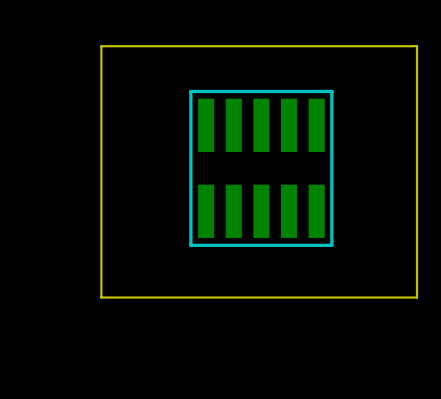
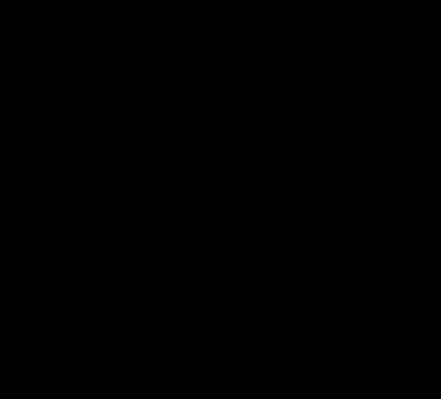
board edge: (417, 46) (101, 46) (101, 297) (417, 297) (417, 46) -> none
part: (261, 168) -> none

